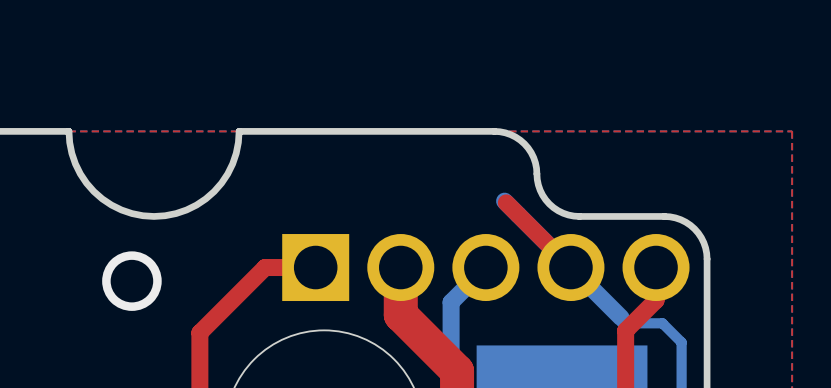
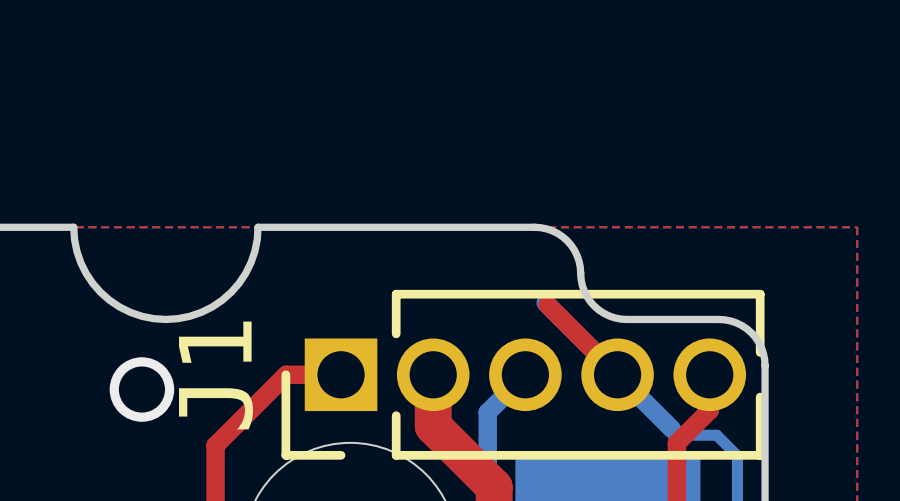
J1 side: bottom (485, 267) -> top (523, 374)

